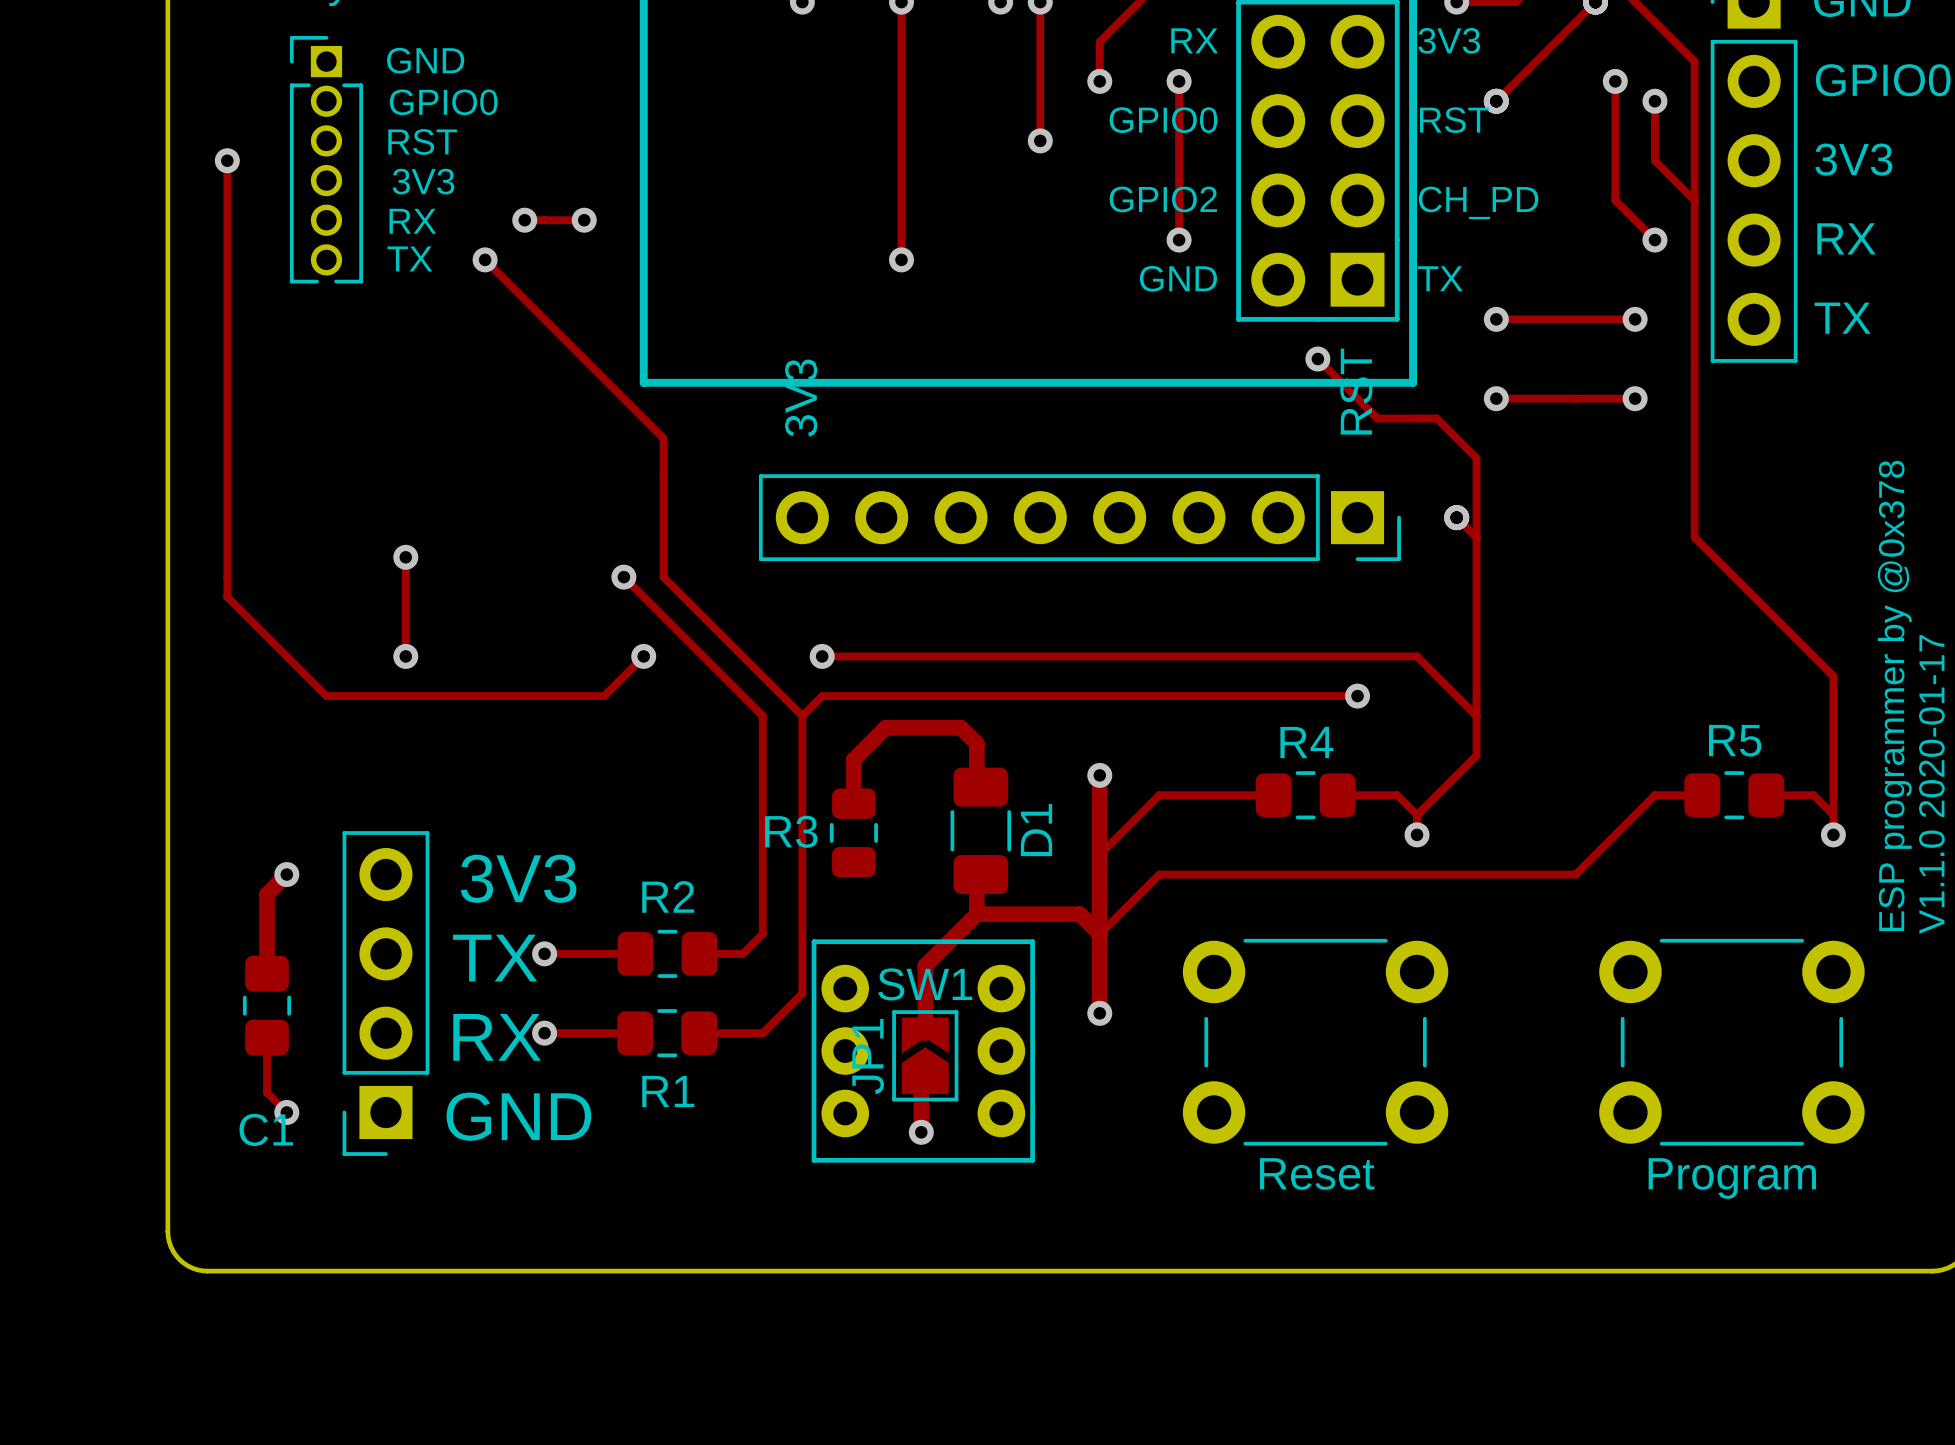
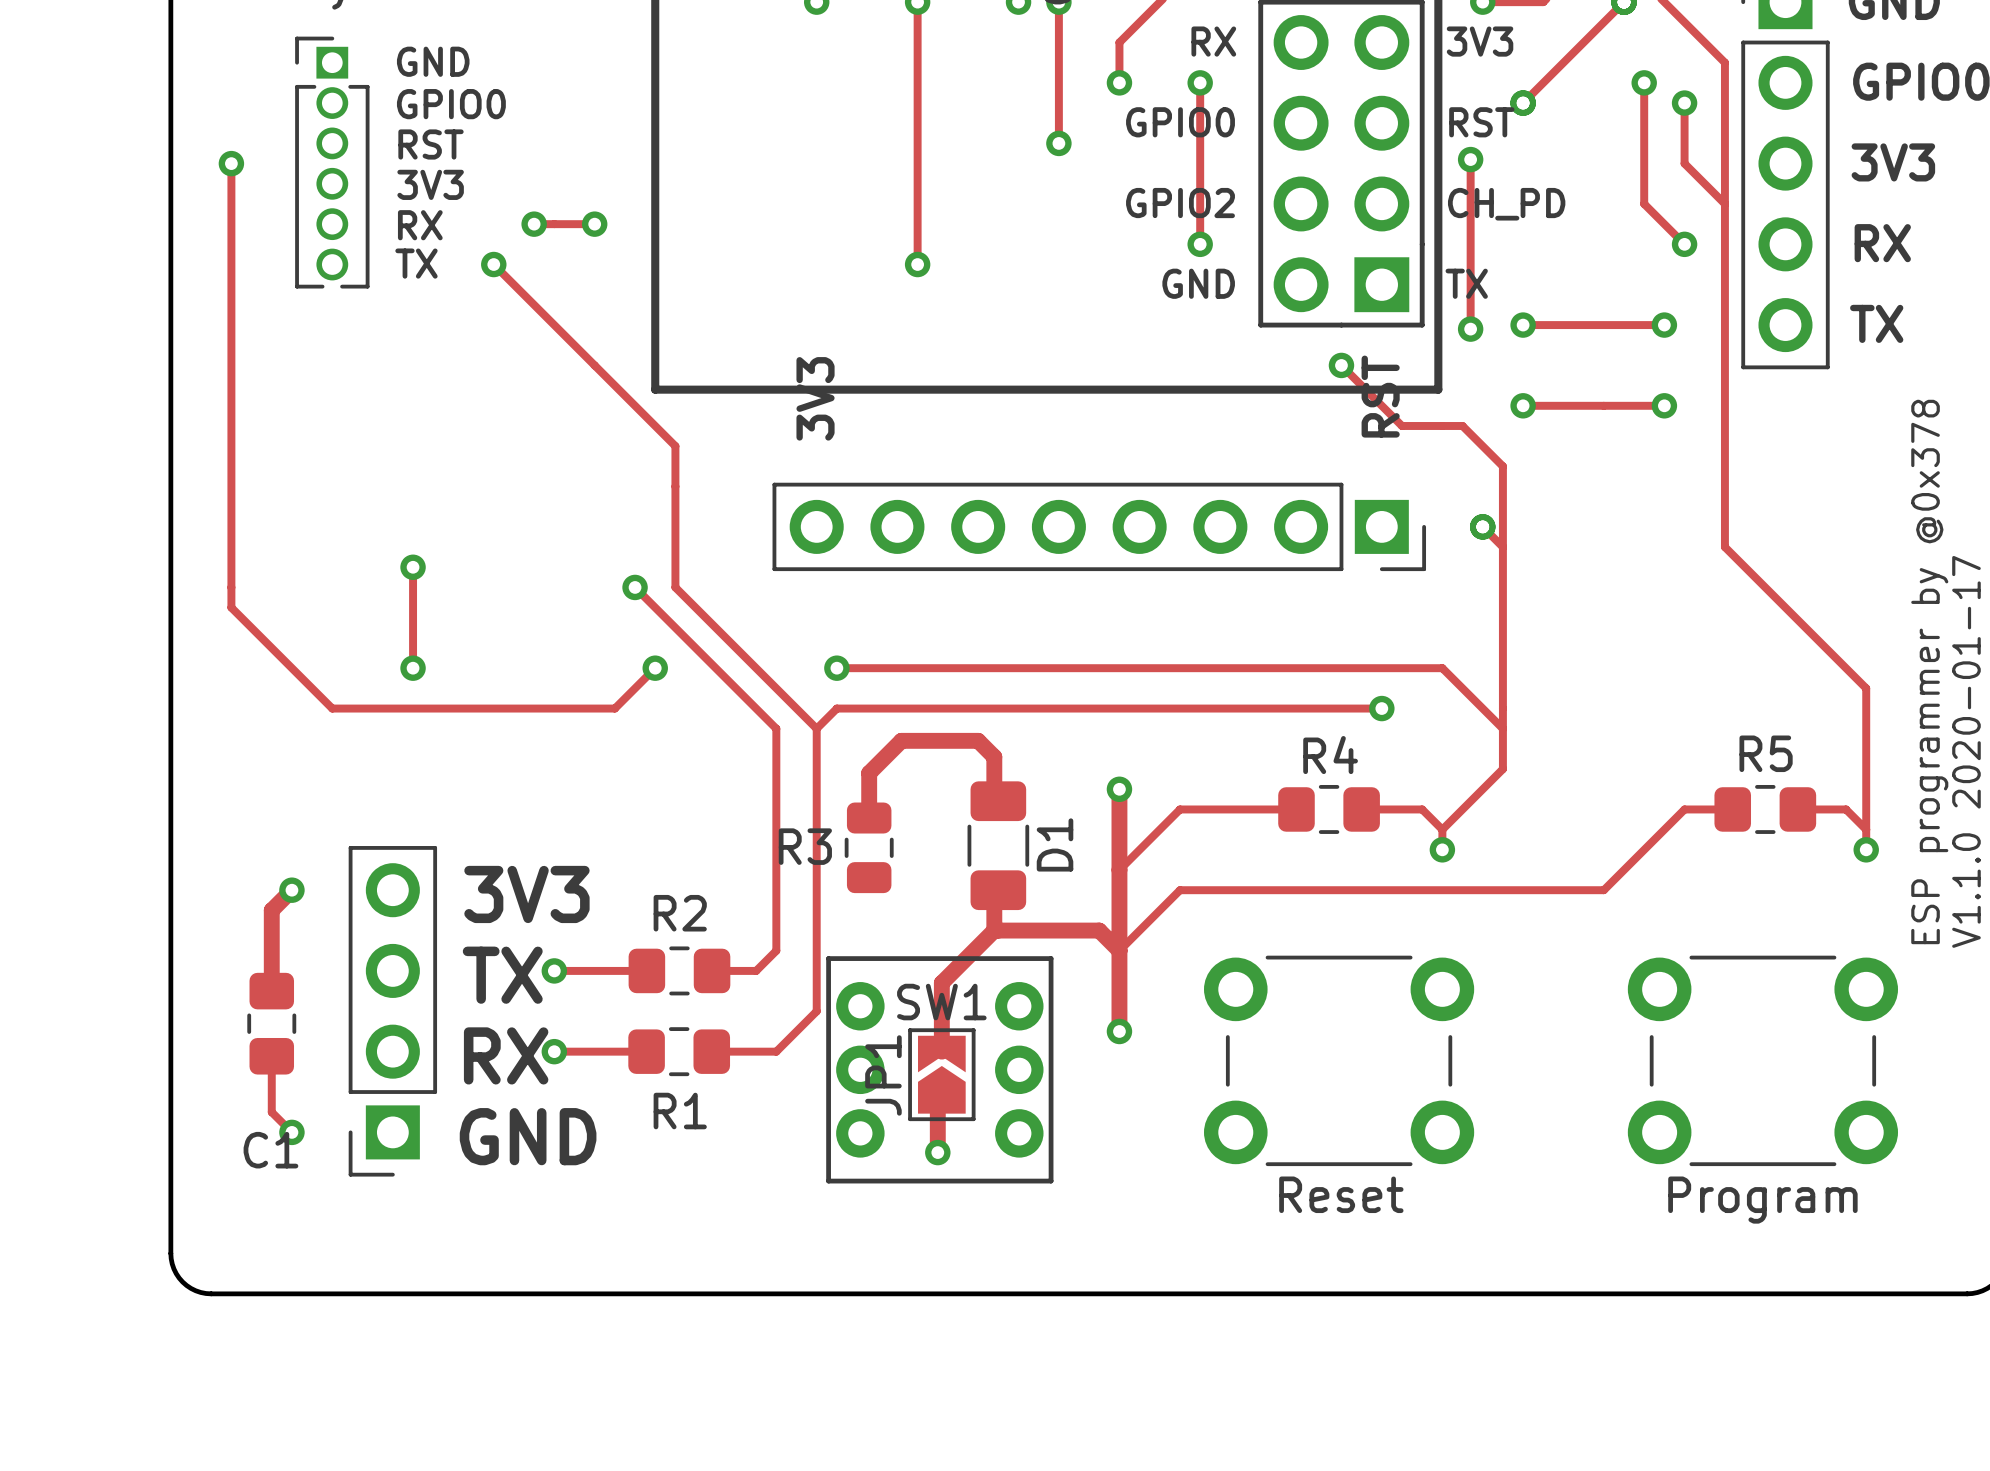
track: none -> (1470, 159) (1470, 329)
via: none -> (1470, 159)
via: none -> (1470, 329)

